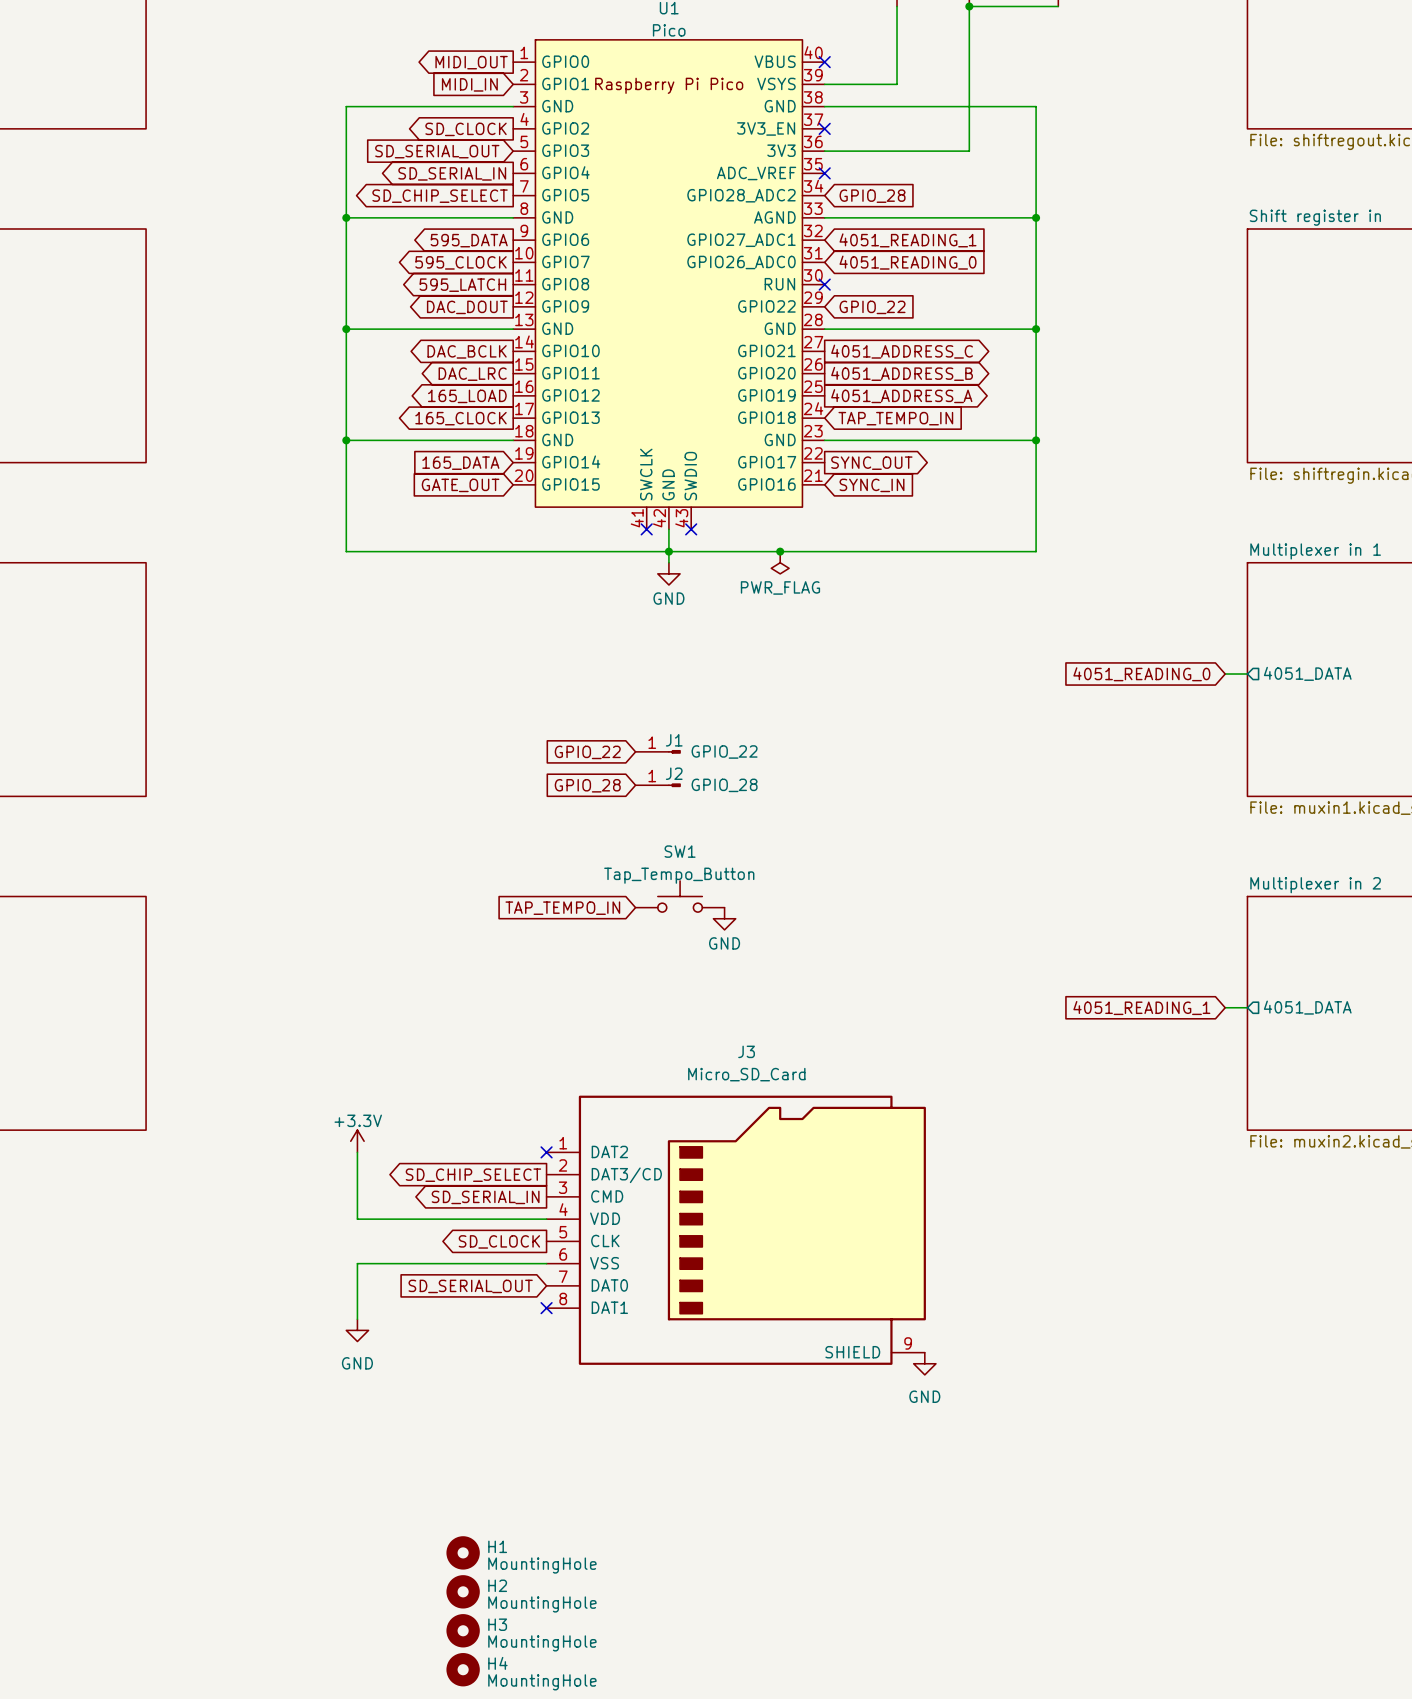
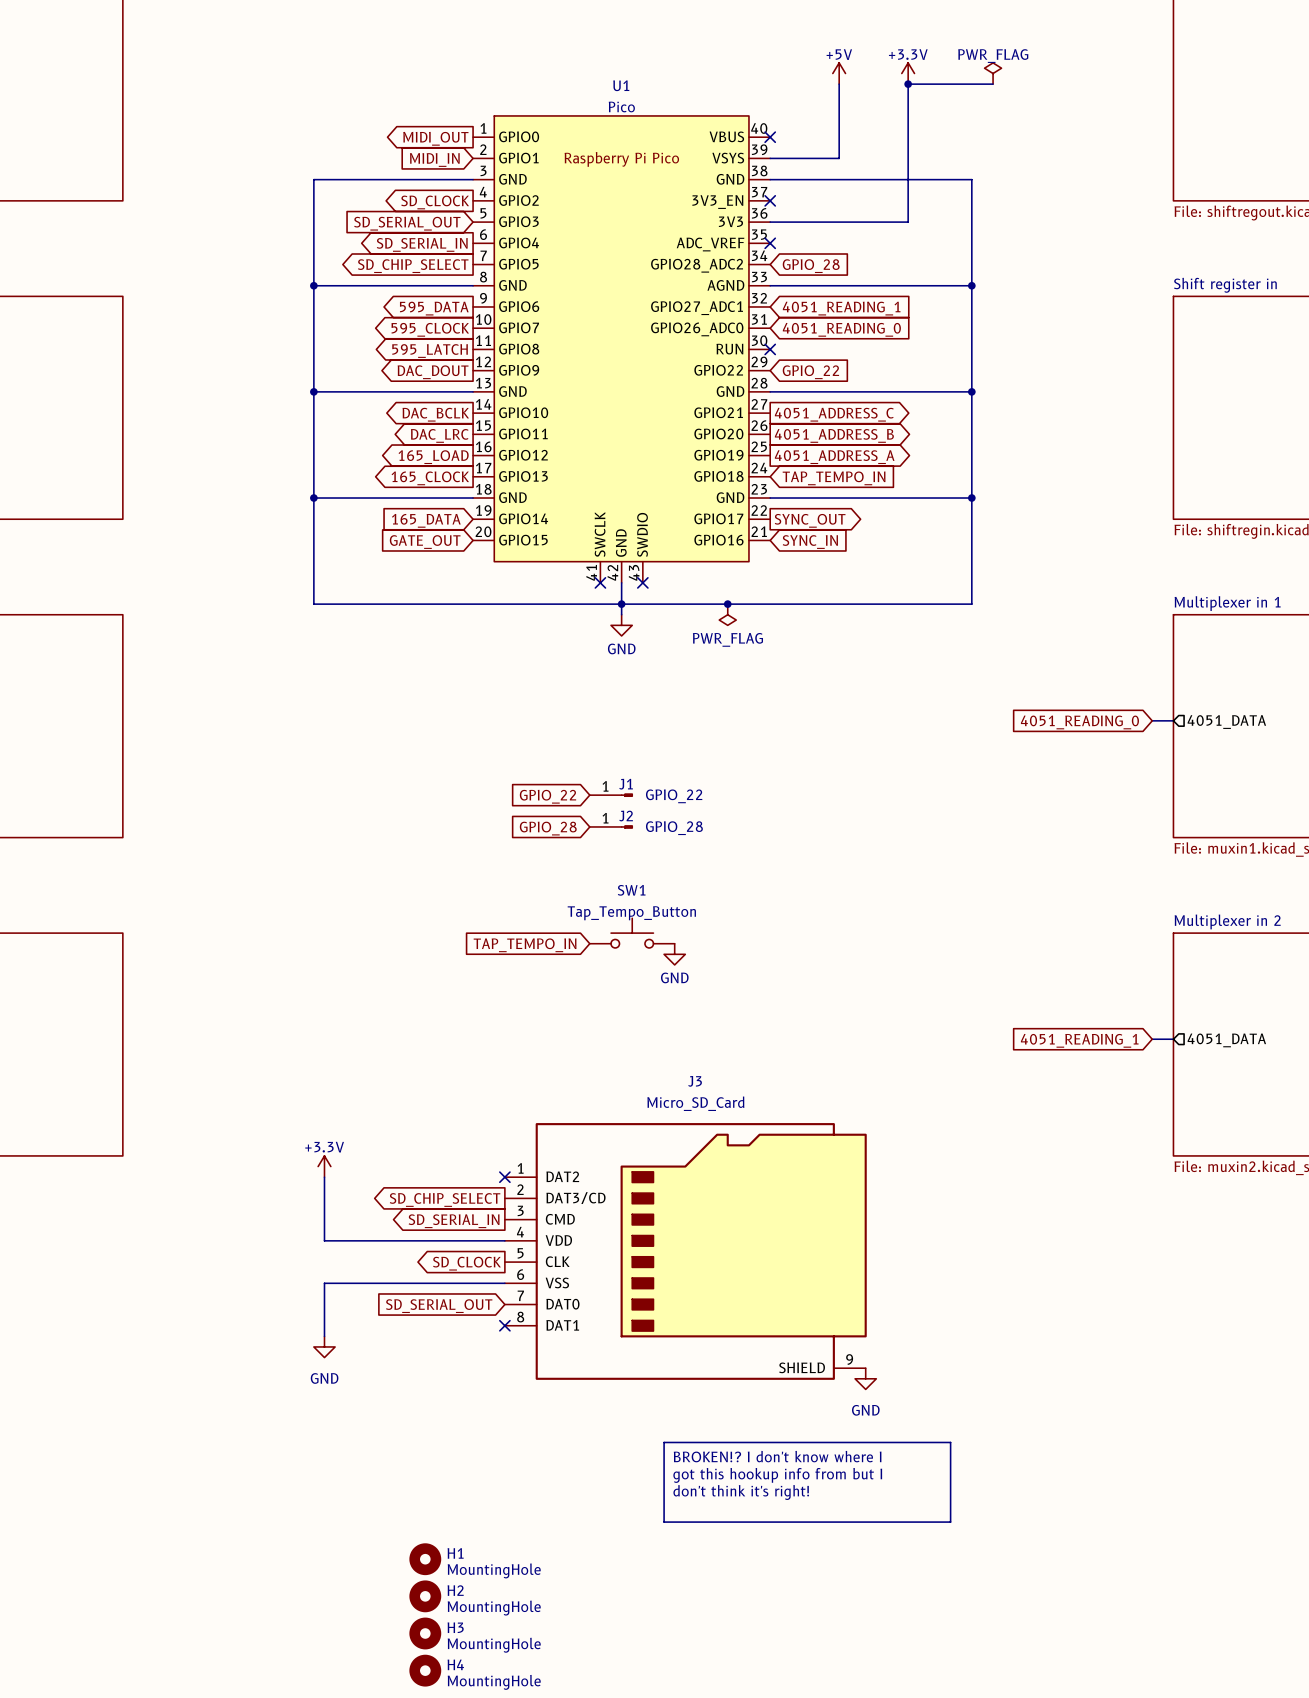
line: none -> (664, 1442) (950, 1442) (950, 1522) (664, 1522) (664, 1442)
text: none -> BROKEN!? I don't know where I (777, 1456)
text: none -> got this hookup info from but I (777, 1475)
text: none -> don't think it's right! (741, 1492)

